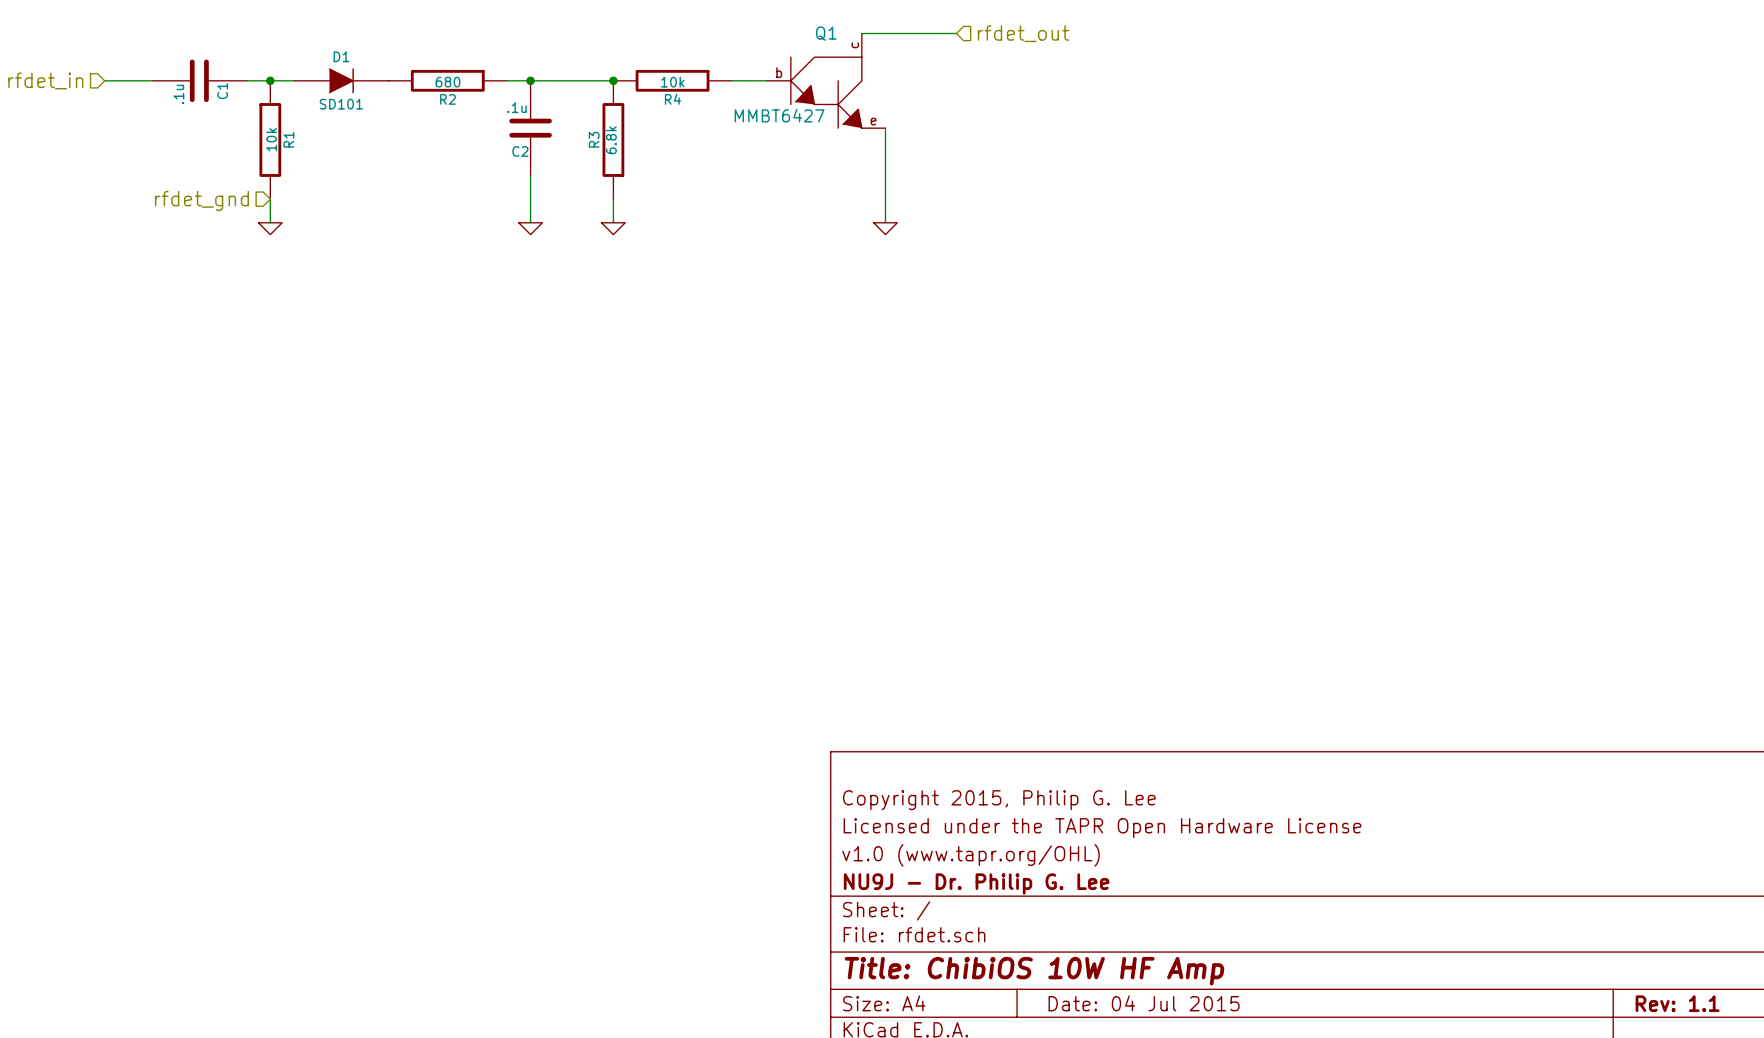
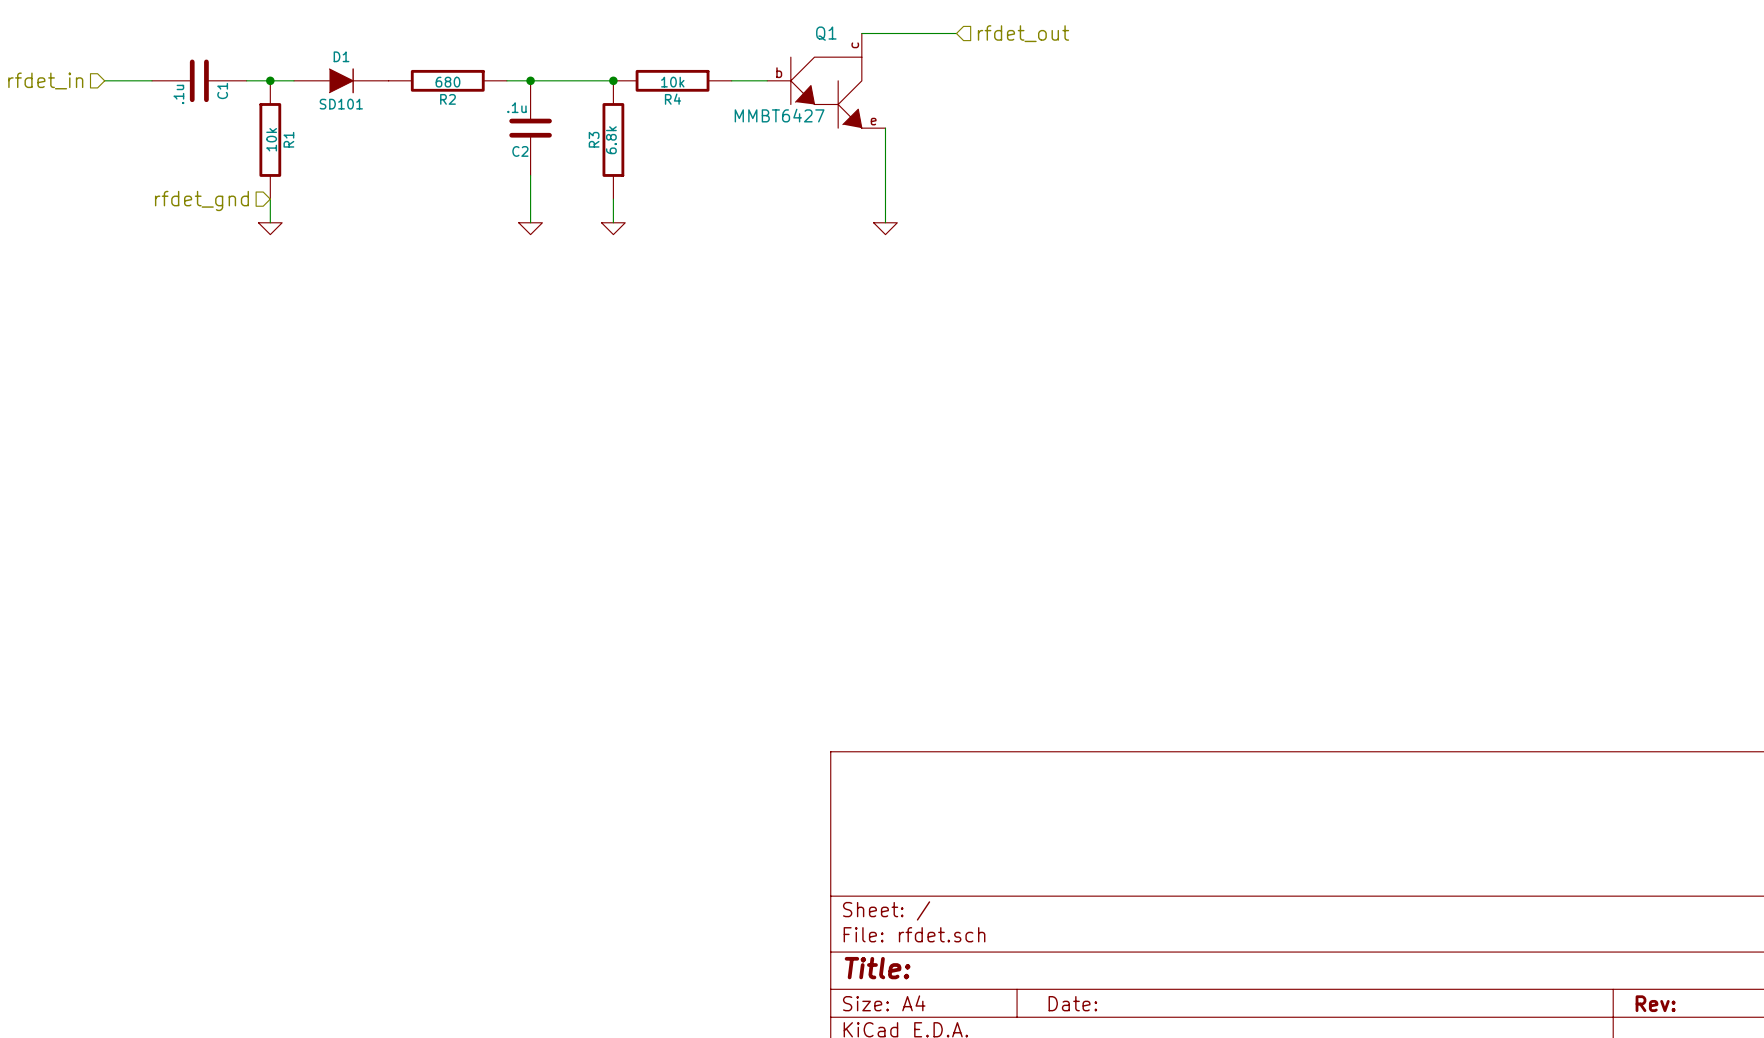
title block: Copyright 2015, Philip G. Lee (999, 800) -> none
title block: Licensed under the TAPR Open Hardware License (1102, 828) -> none
title block: v1.0 (www.tapr.org/OHL) (971, 855) -> none
title block: NU9J - Dr. Philip G. Lee (976, 883) -> none
title block: Title: ChibiOS 10W HF Amp (1034, 971) -> Title: (877, 968)
title block: Date: 04 Jul 2015 (1144, 1003) -> Date: (1072, 1003)
title block: Rev: 1.1 (1677, 1003) -> Rev: (1655, 1003)

